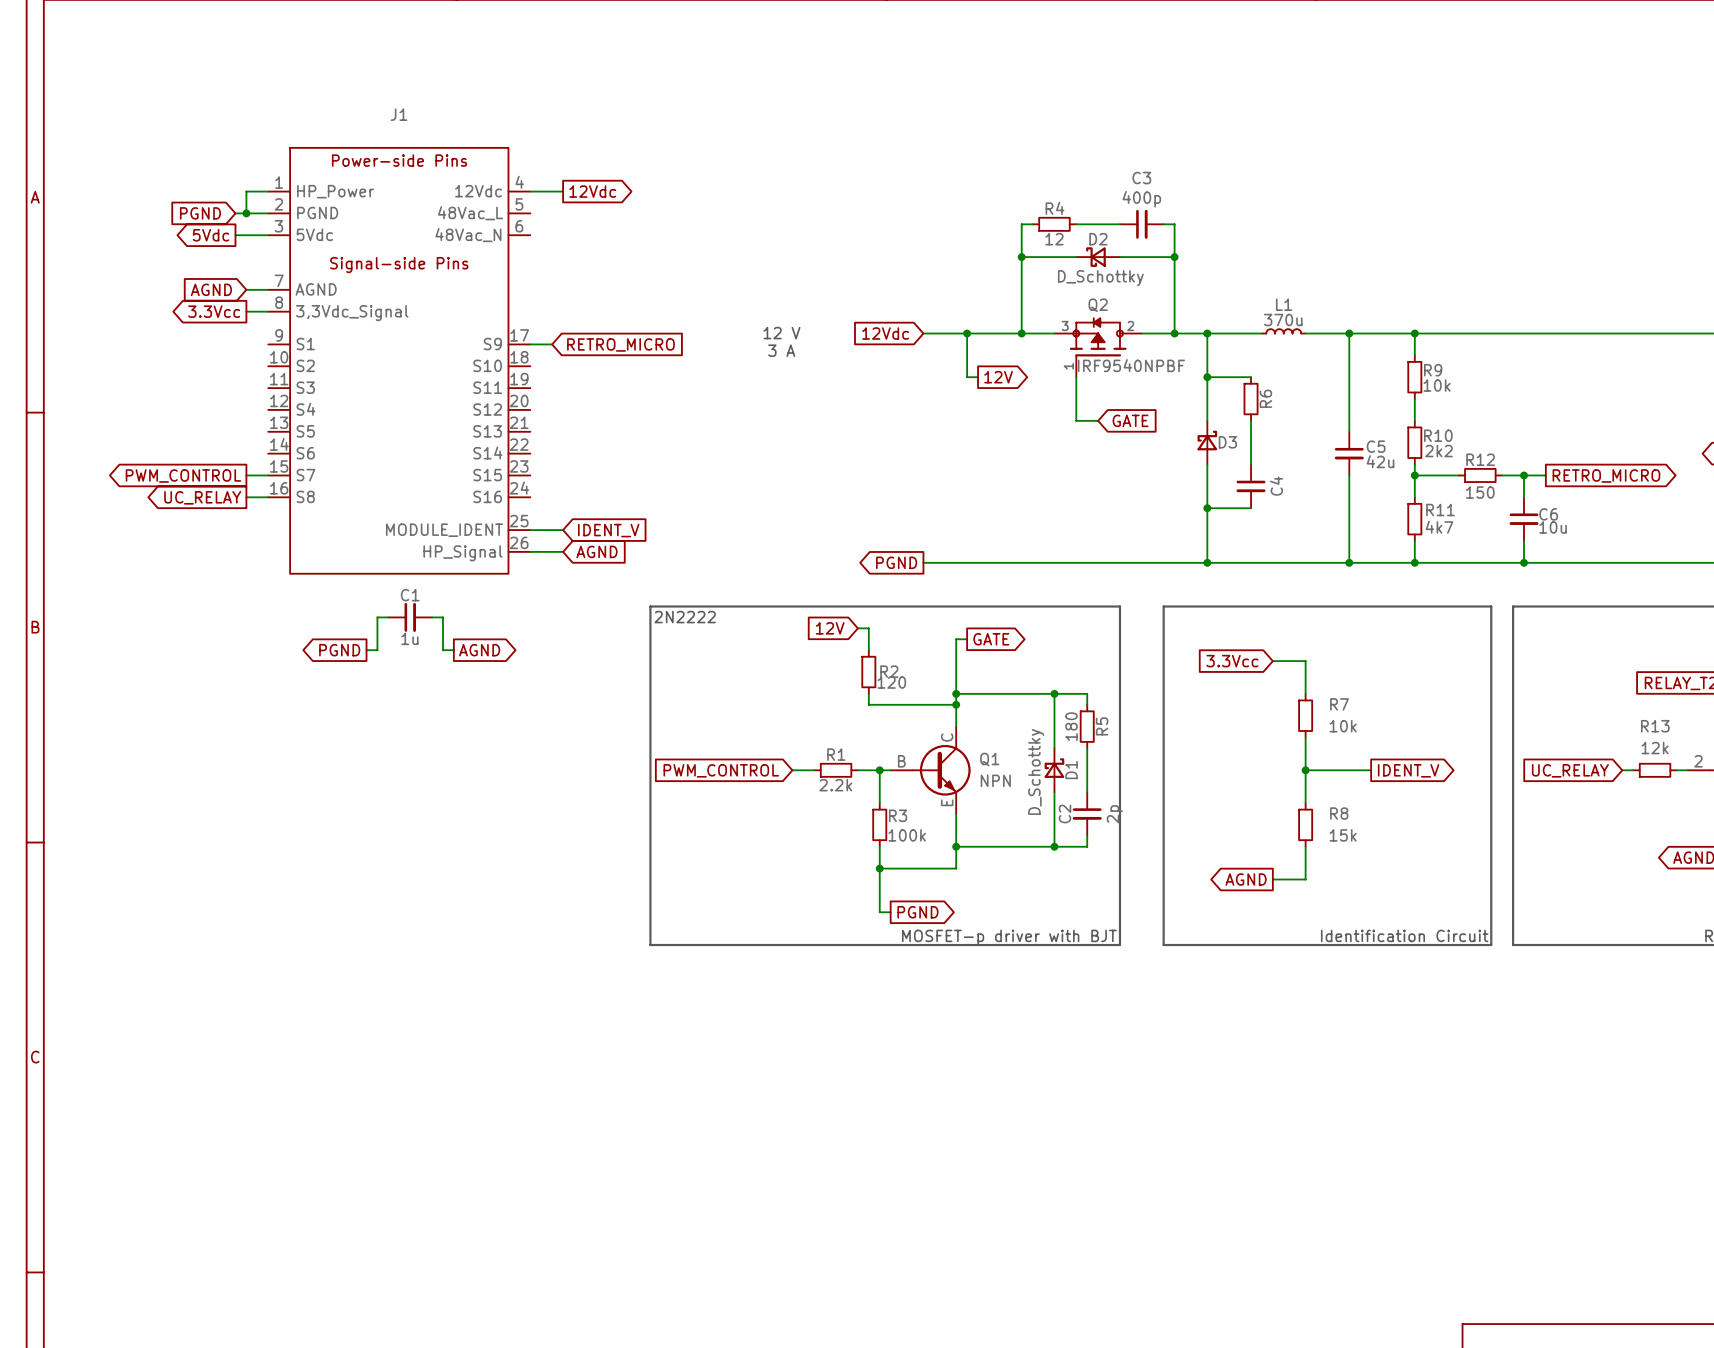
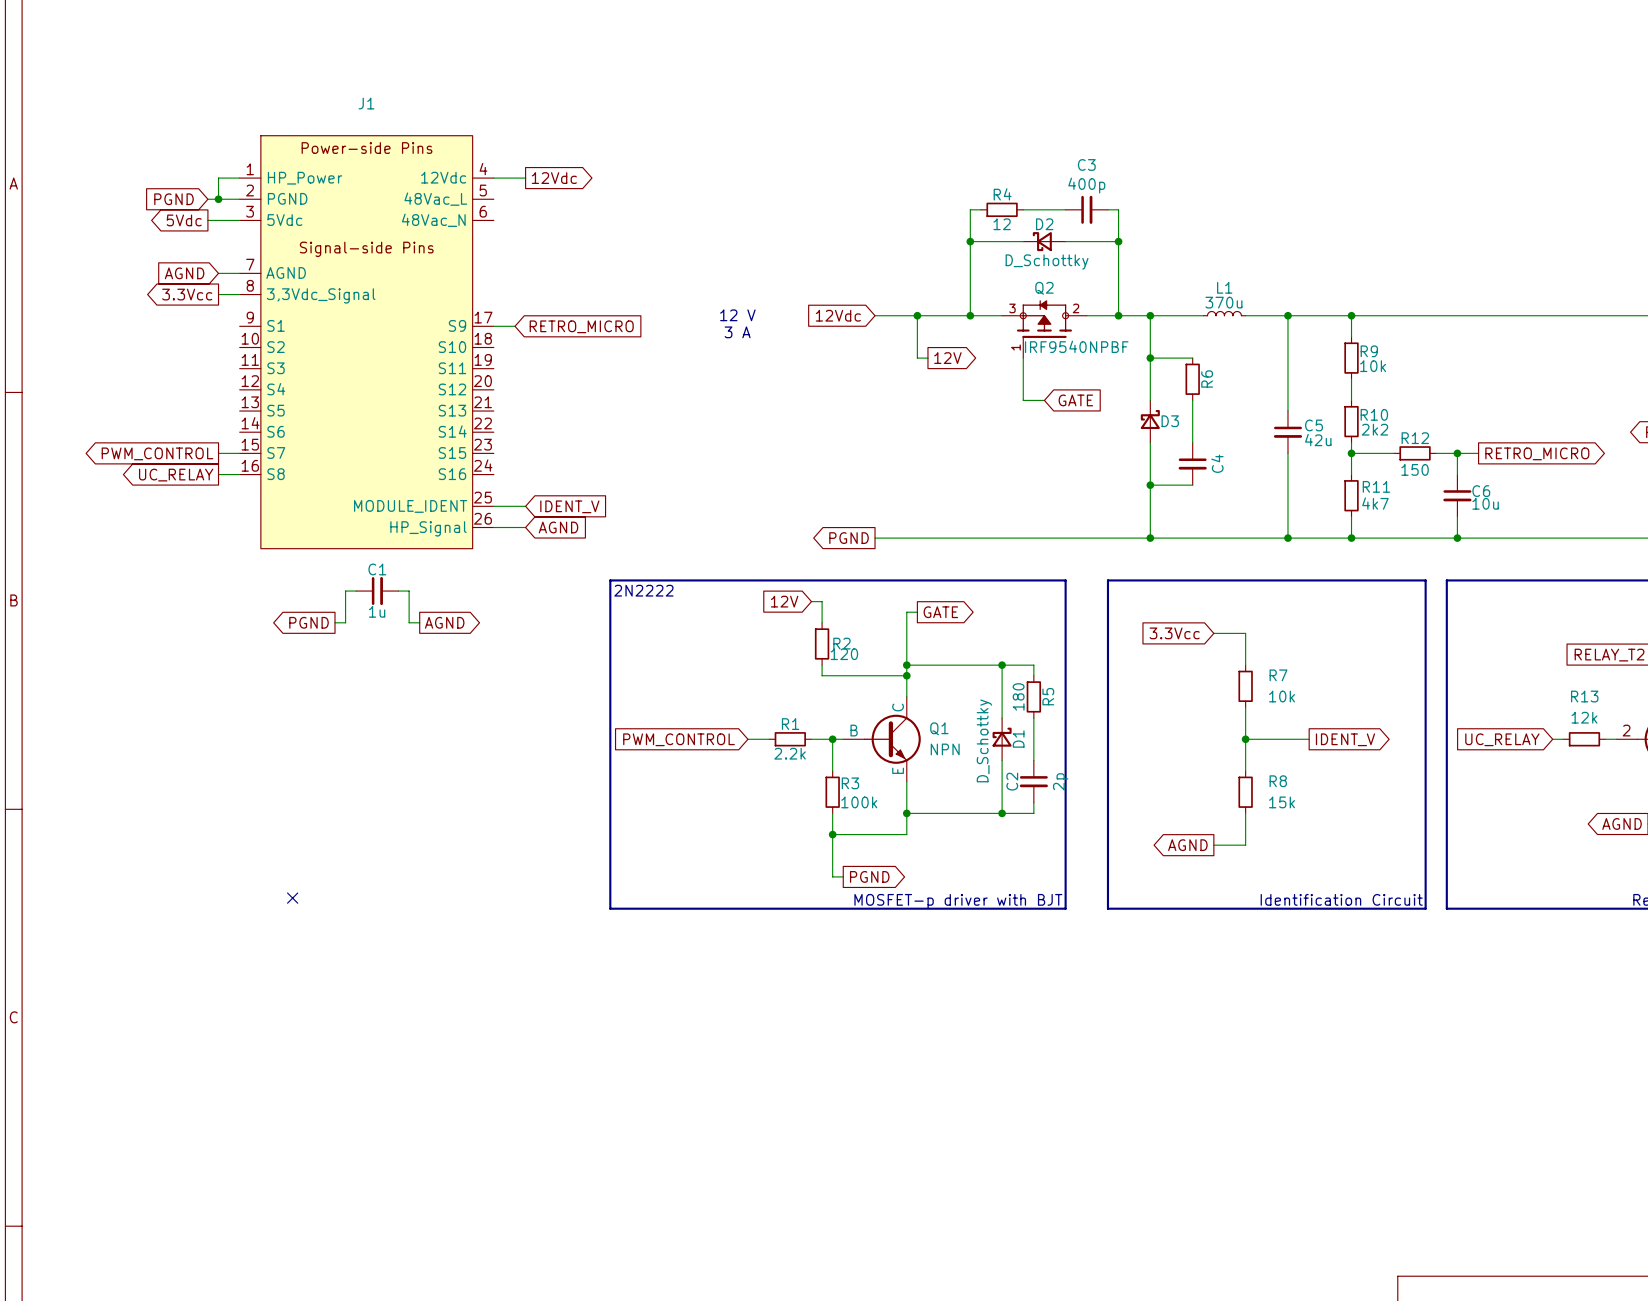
no-connect mark: none -> (292, 898)

